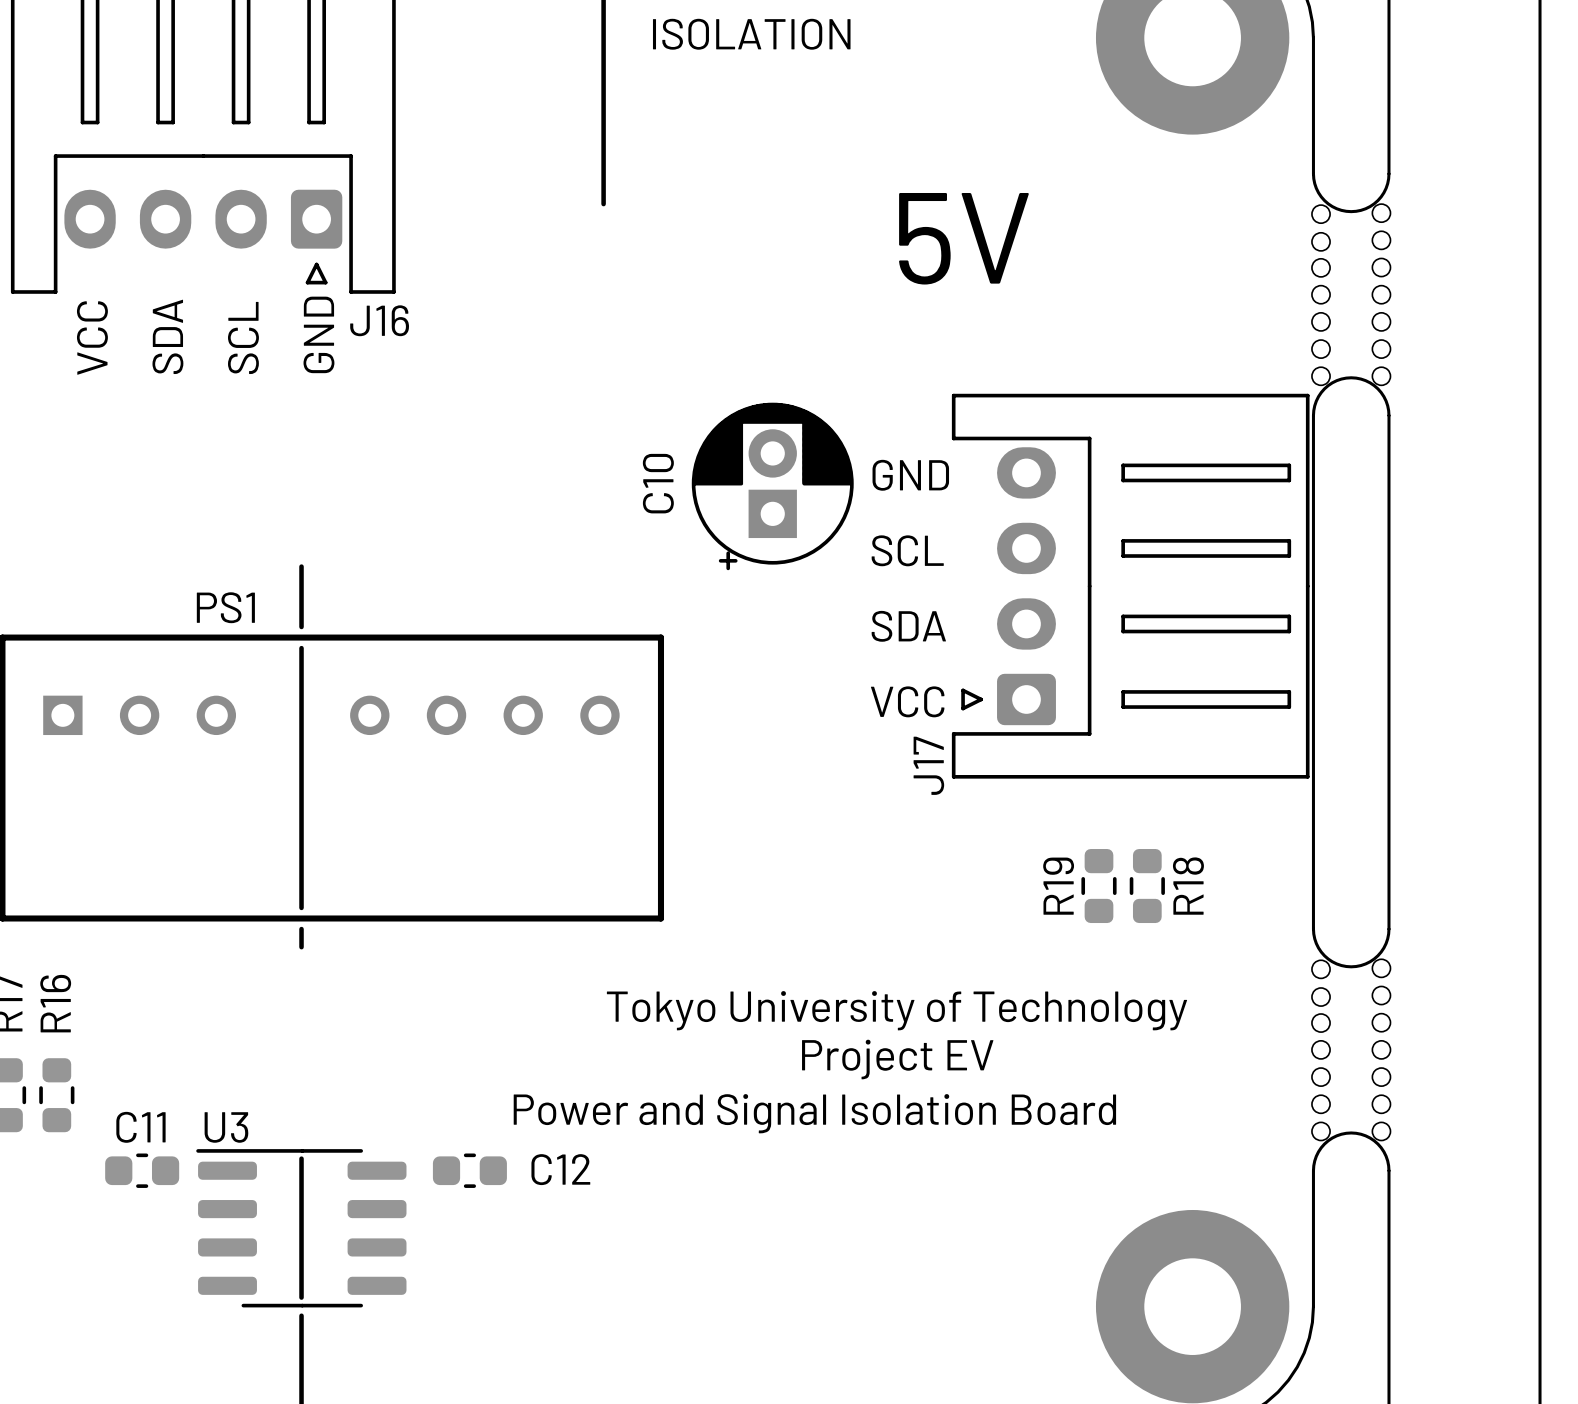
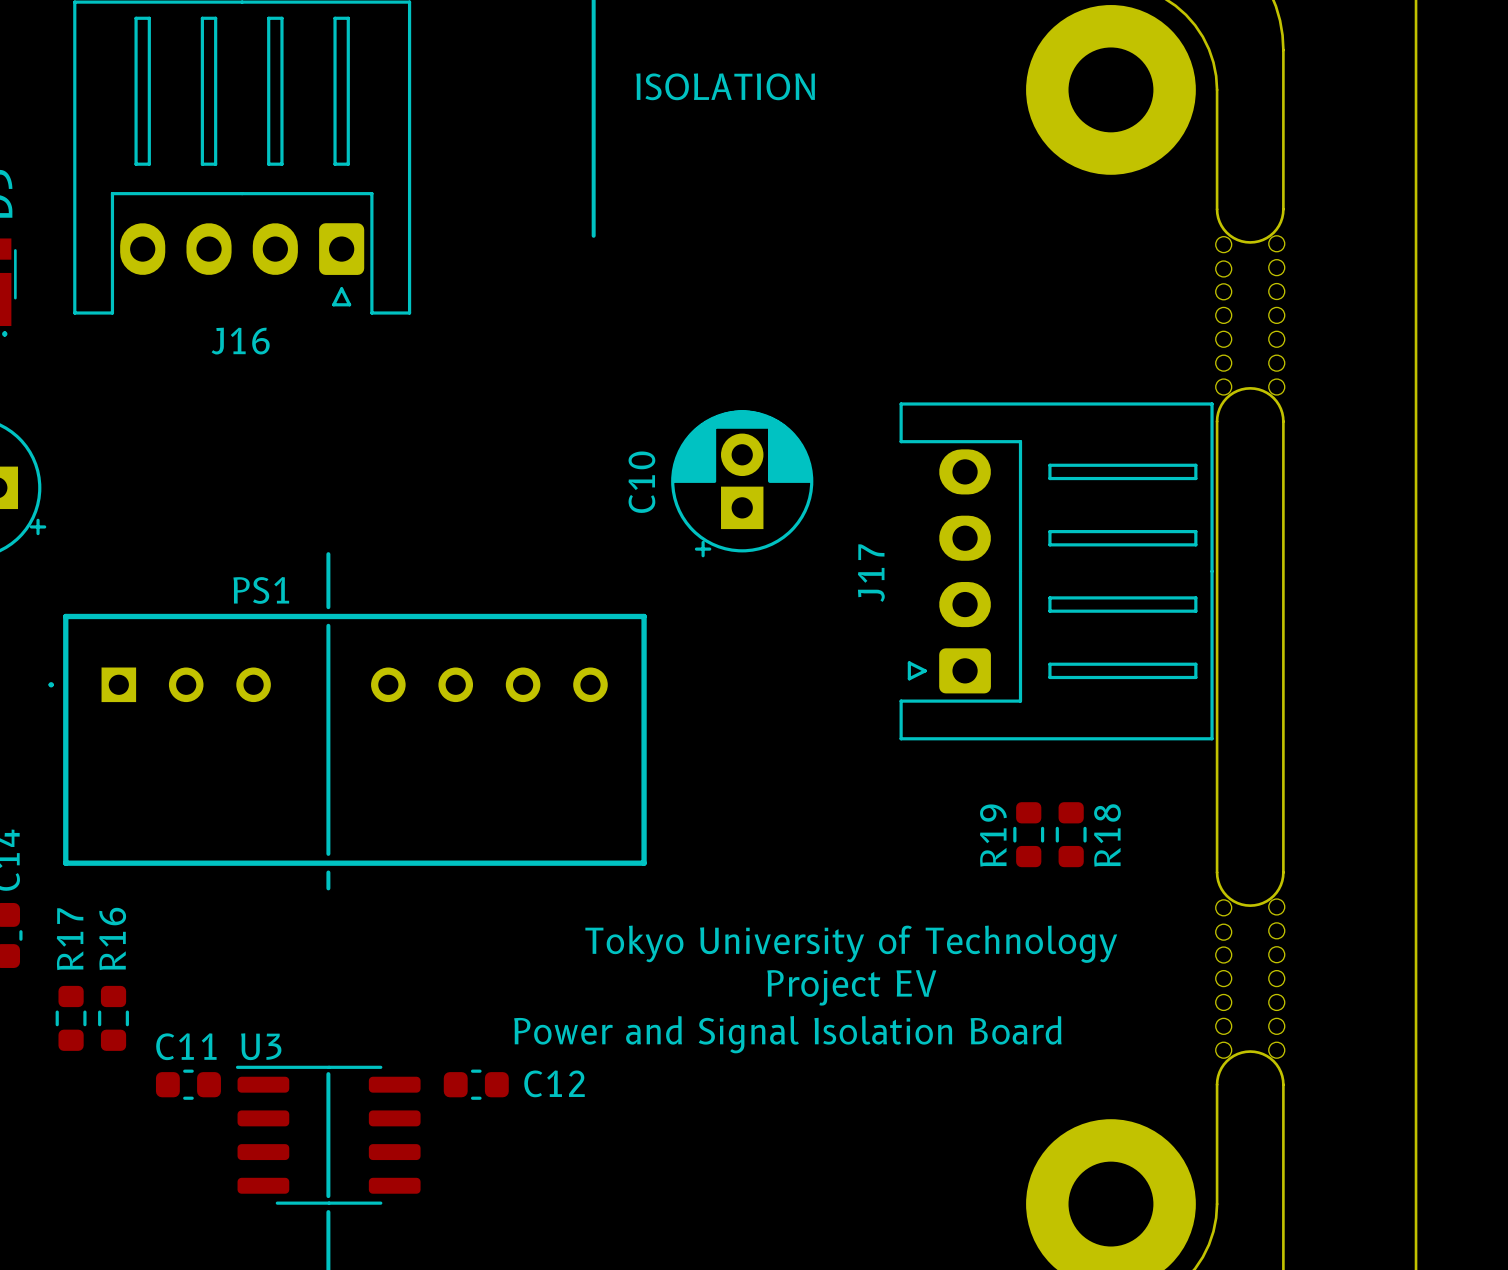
text: 5V (964, 238) -> none
J16 name position: J16 (379, 320) -> J16 (240, 341)
text: GND (318, 334) -> none
text: SDA (167, 336) -> none
text: SCL (243, 337) -> none
text: VCC (92, 338) -> none
text: GND (910, 475) -> none
text: SCL (907, 550) -> none
text: SDA (908, 626) -> none
text: VCC (907, 701) -> none
J17 name position: J17 (928, 765) -> J17 (871, 573)

